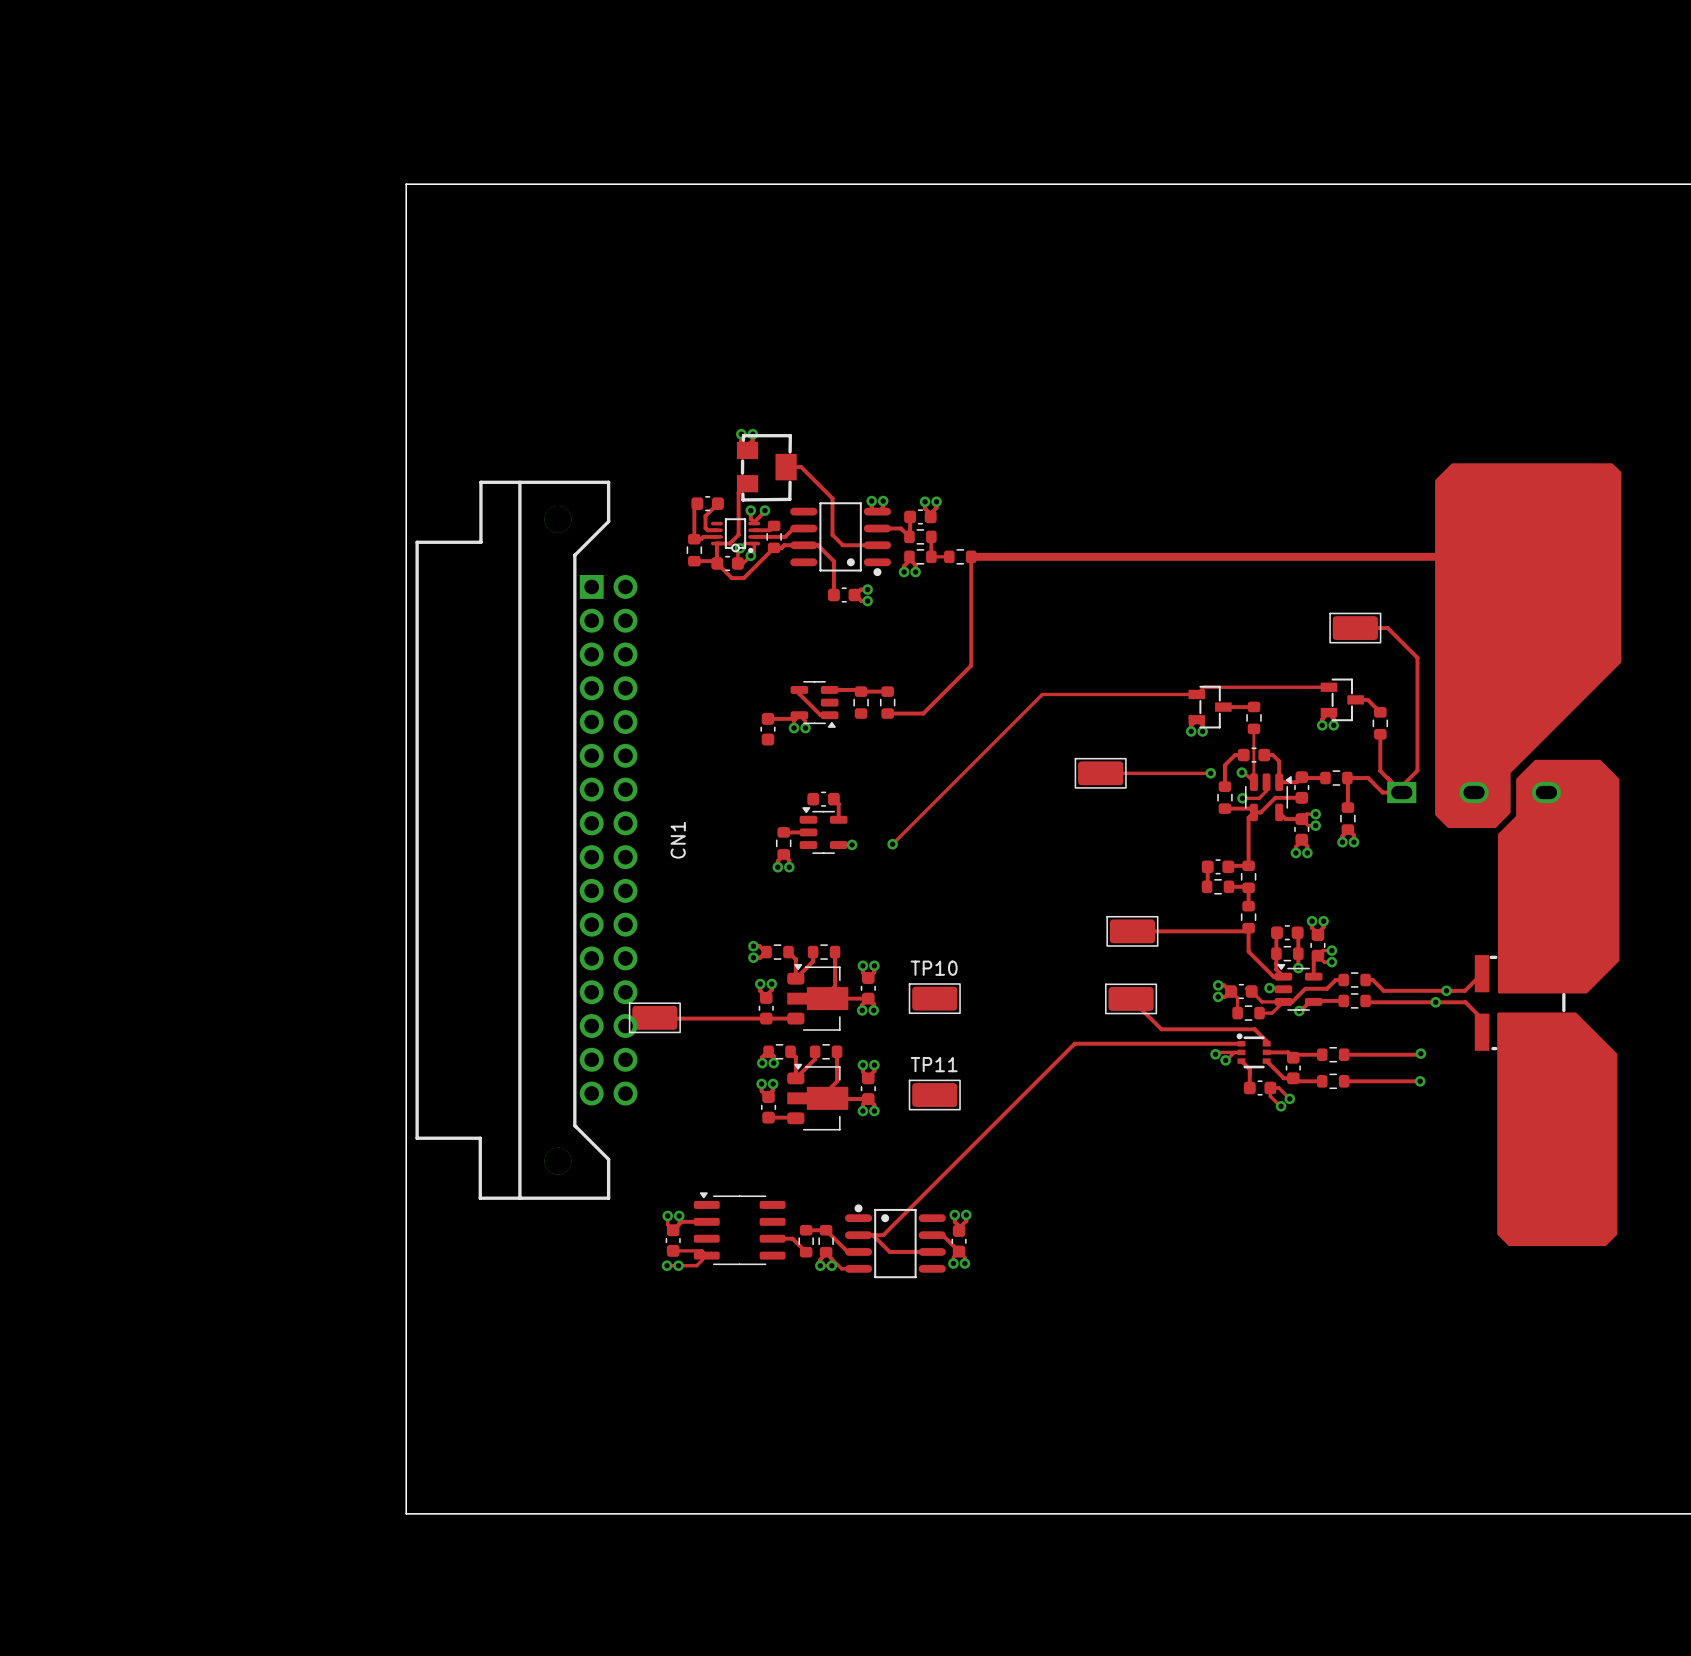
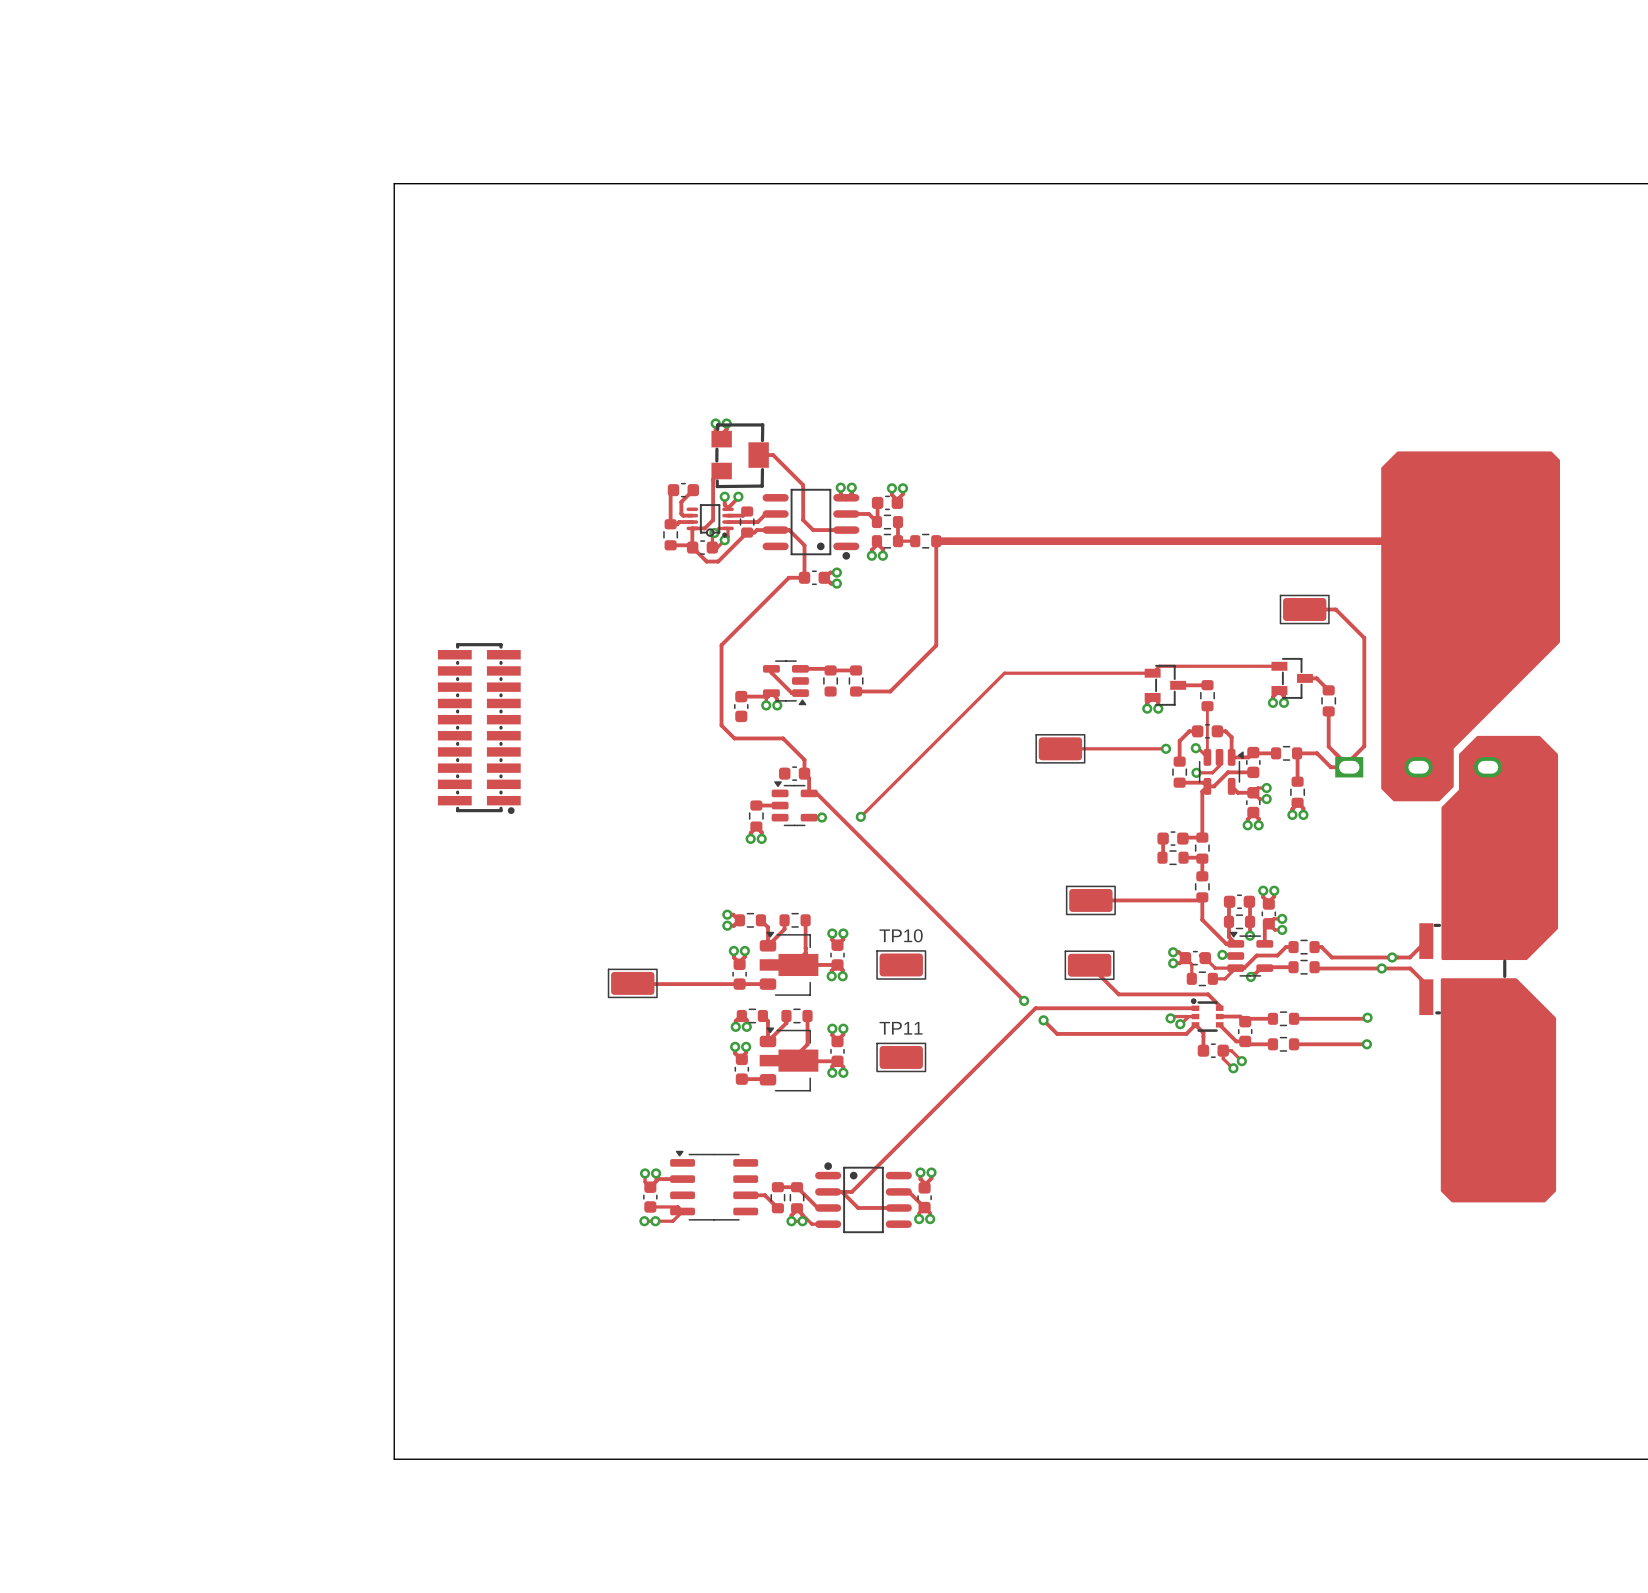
track: none -> (804, 577) (788, 577) (721, 645) (721, 725) (734, 738) (783, 738) (804, 759) (804, 773)
part: none -> (479, 728)
track: none -> (809, 792) (816, 792) (1024, 1000)
CN1: (526, 840) -> none
via: none -> (1024, 1000)
track: none -> (1043, 1020) (1057, 1033) (1186, 1033) (1195, 1024)
via: none -> (1043, 1020)

